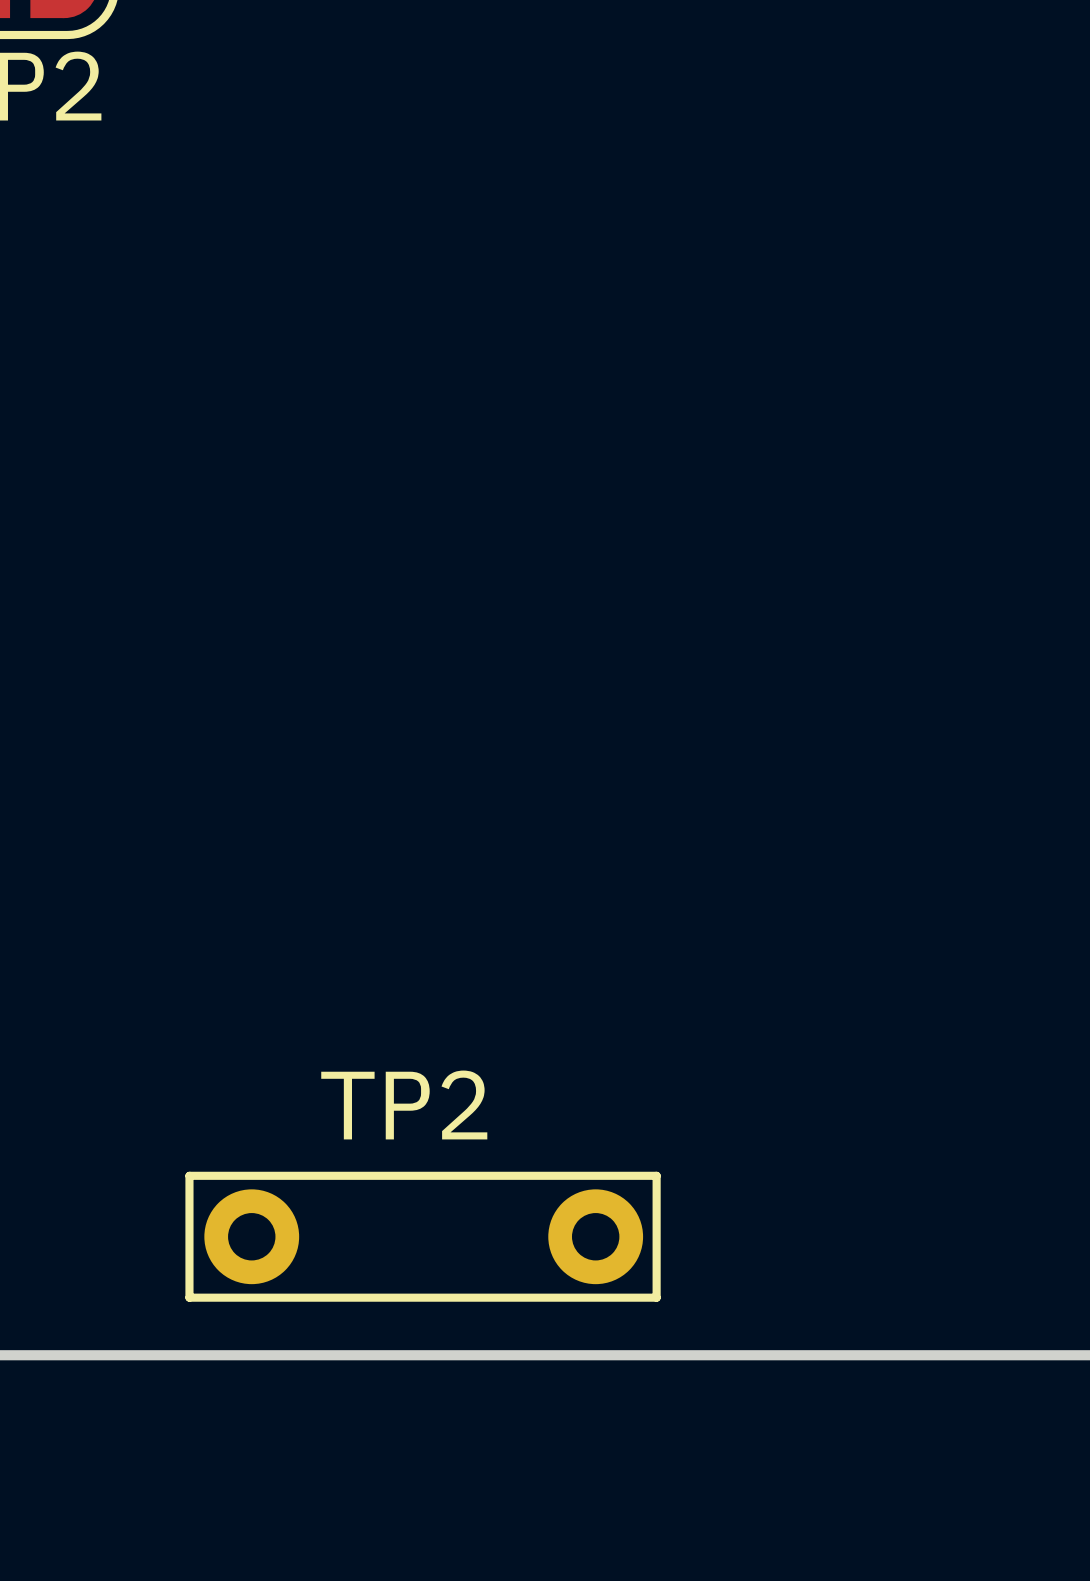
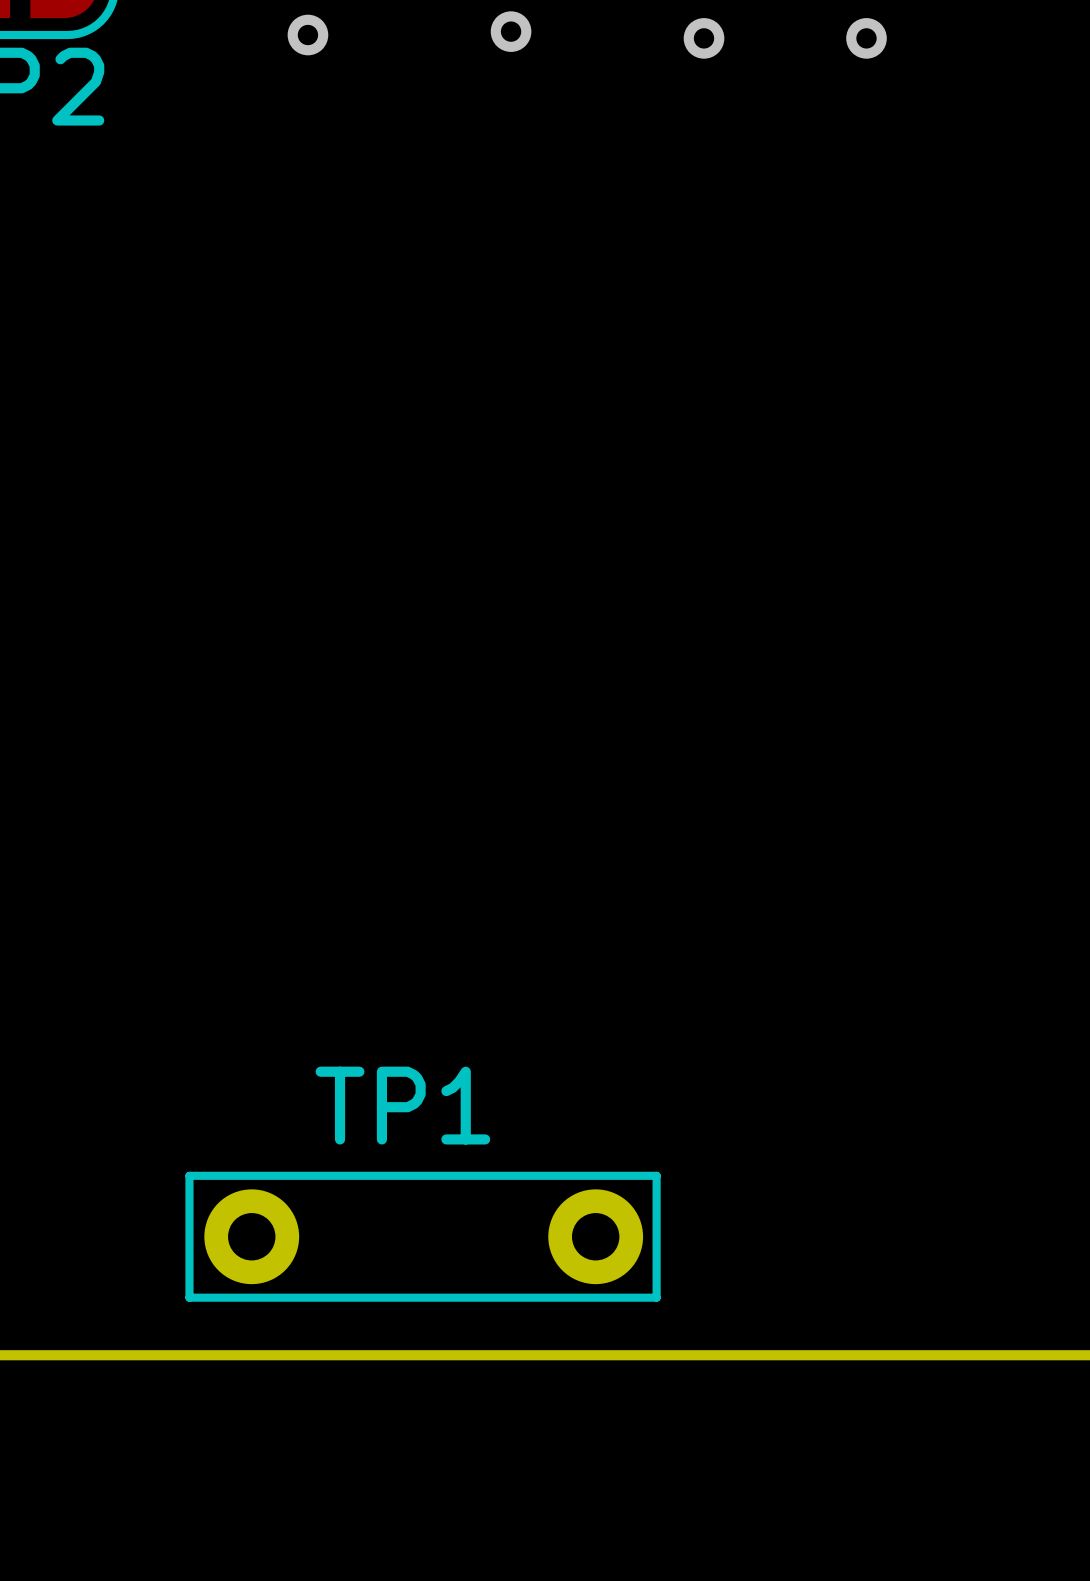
via: none -> (511, 31)
via: none -> (307, 35)
via: none -> (704, 38)
via: none -> (866, 38)
TP2 name: TP2 (404, 1105) -> TP1 (402, 1105)

